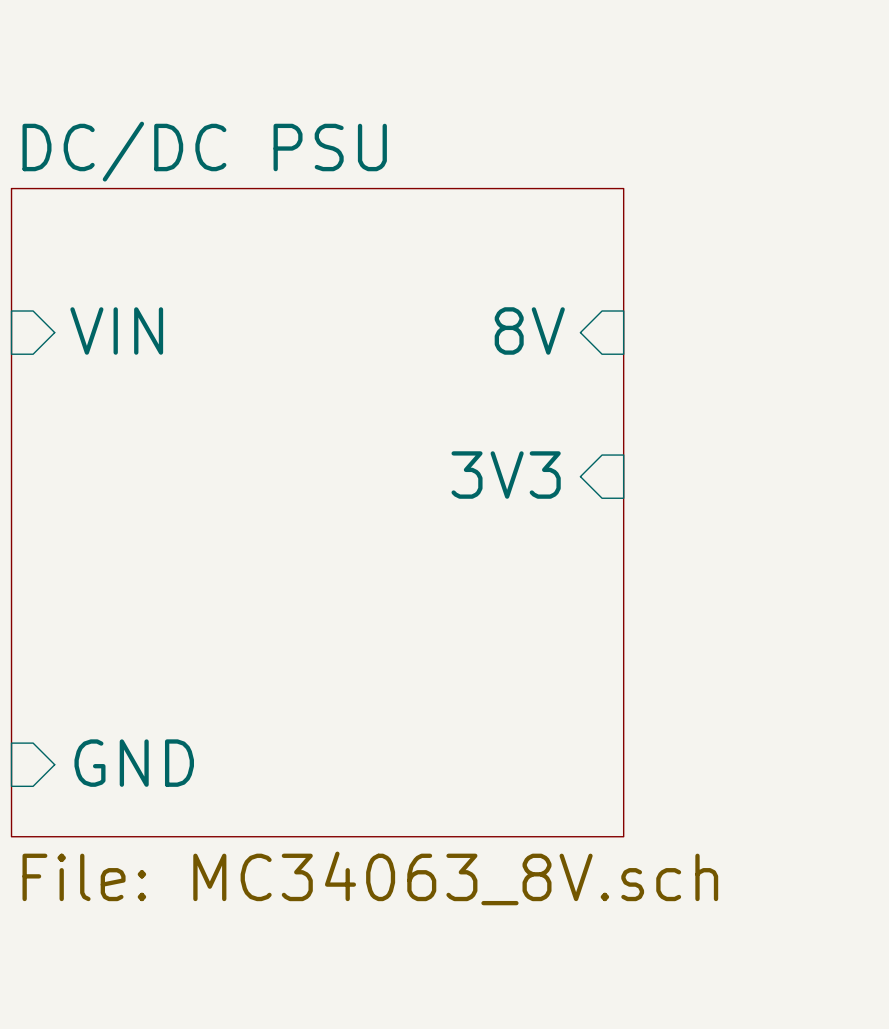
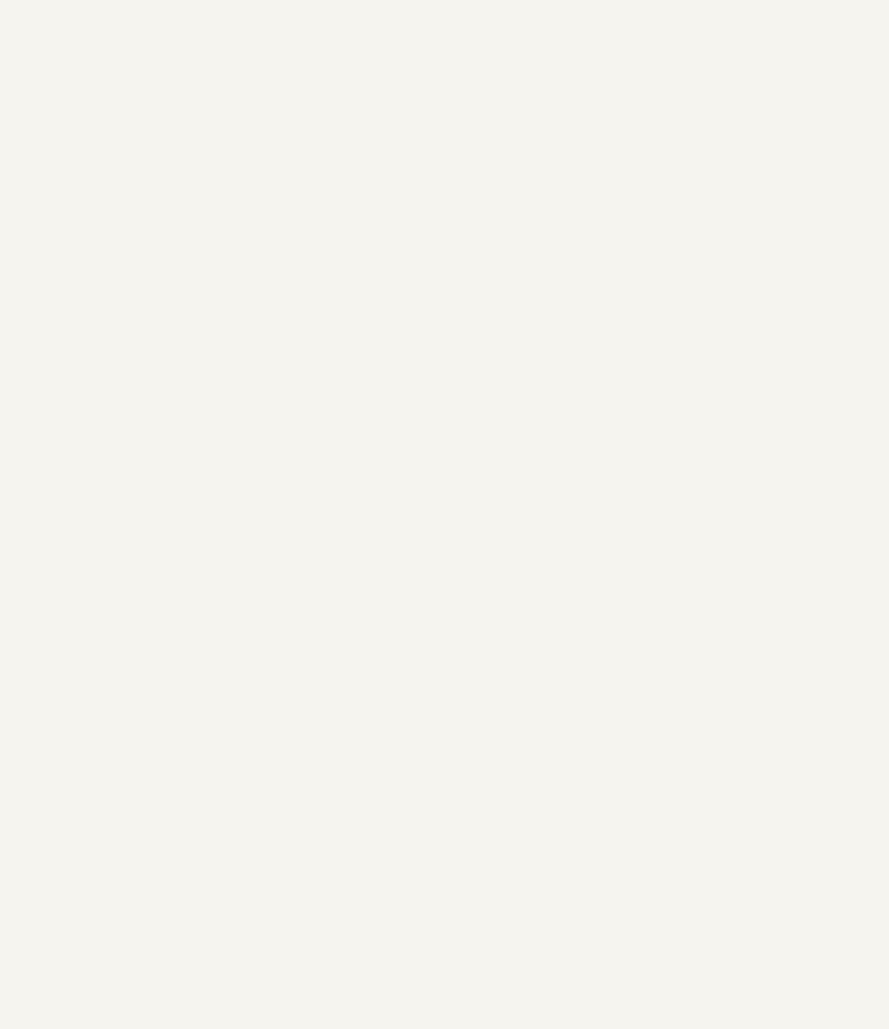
sheet pin: VIN (116, 330) -> none
sheet pin: 8V (529, 330) -> none
sheet pin: 3V3 (506, 475) -> none
sheet DC/DC PSU: File: MC34063_8V.sch (317, 512) -> none
sheet pin: GND (134, 763) -> none

